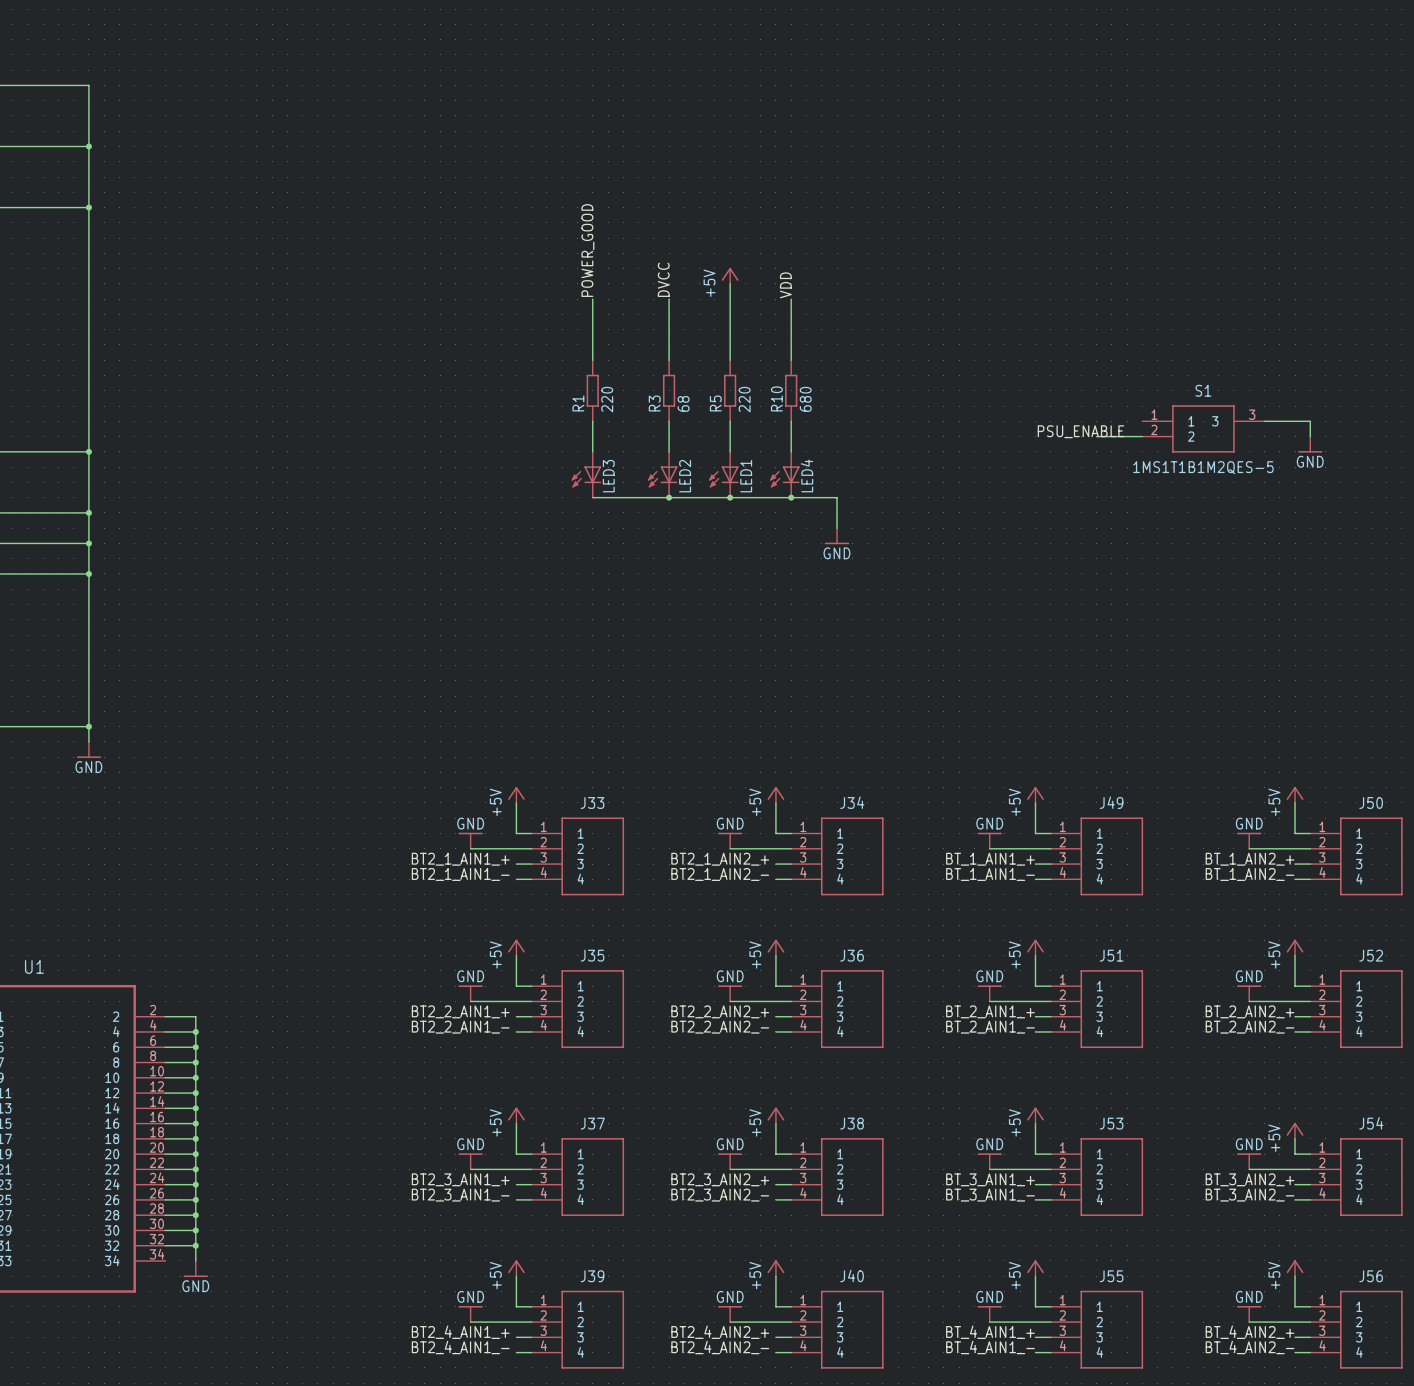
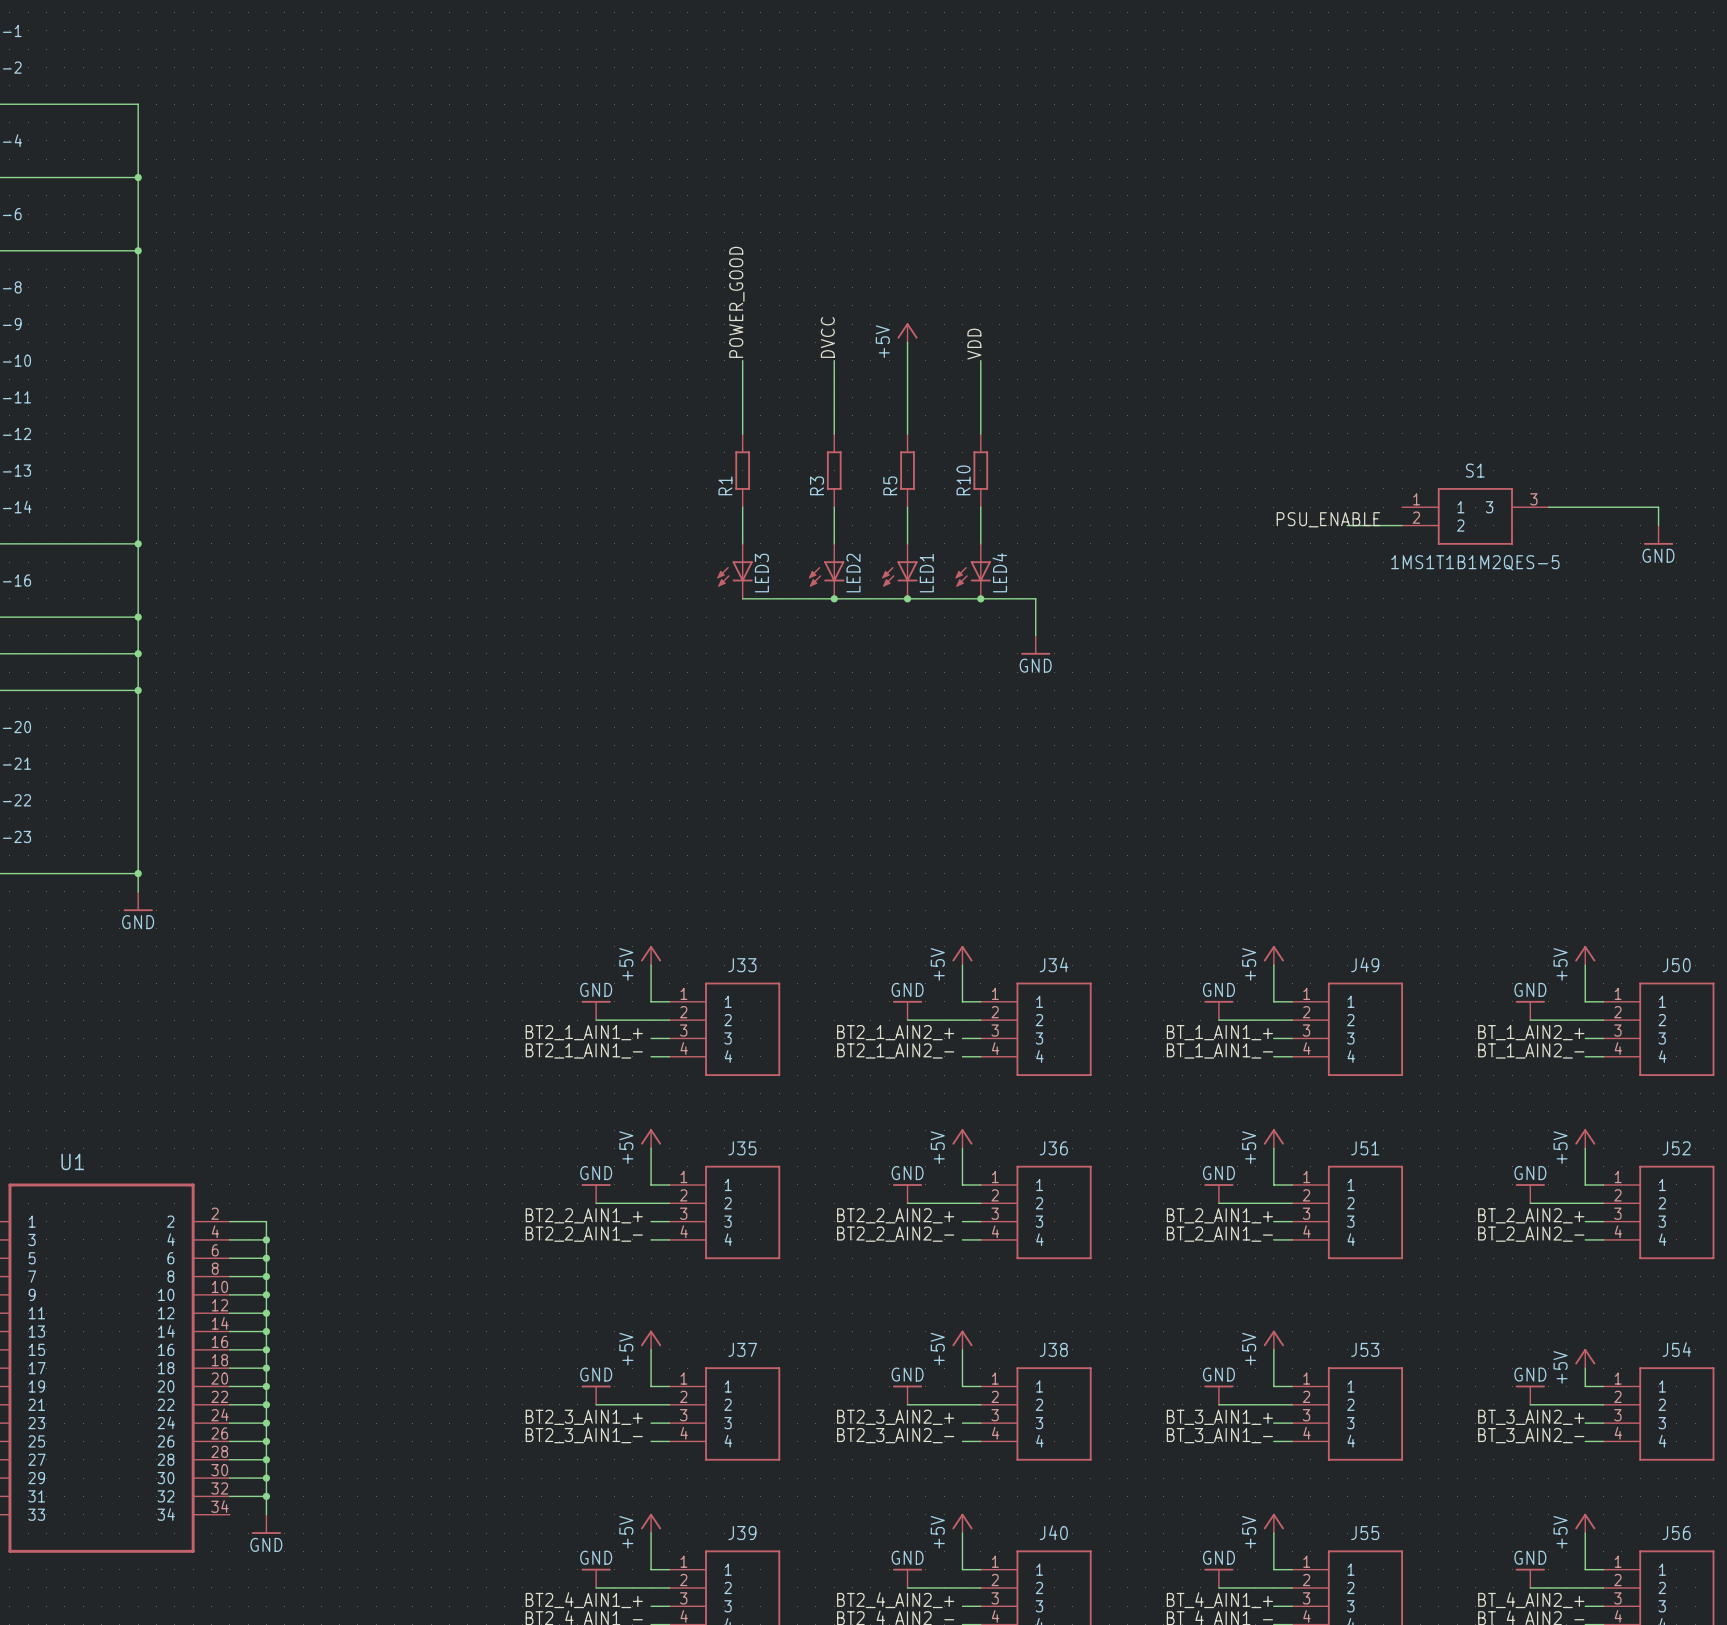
R1 value: 220 (607, 399) -> none
R5 value: 220 (744, 399) -> none
R10 value: 680 (805, 399) -> none
R3 value: 68 (683, 403) -> none
wire: (1310, 421) (1310, 436) -> (1603, 507) (1658, 507) (1658, 525)
power symbol position: GND (1310, 444) -> GND (1658, 535)

